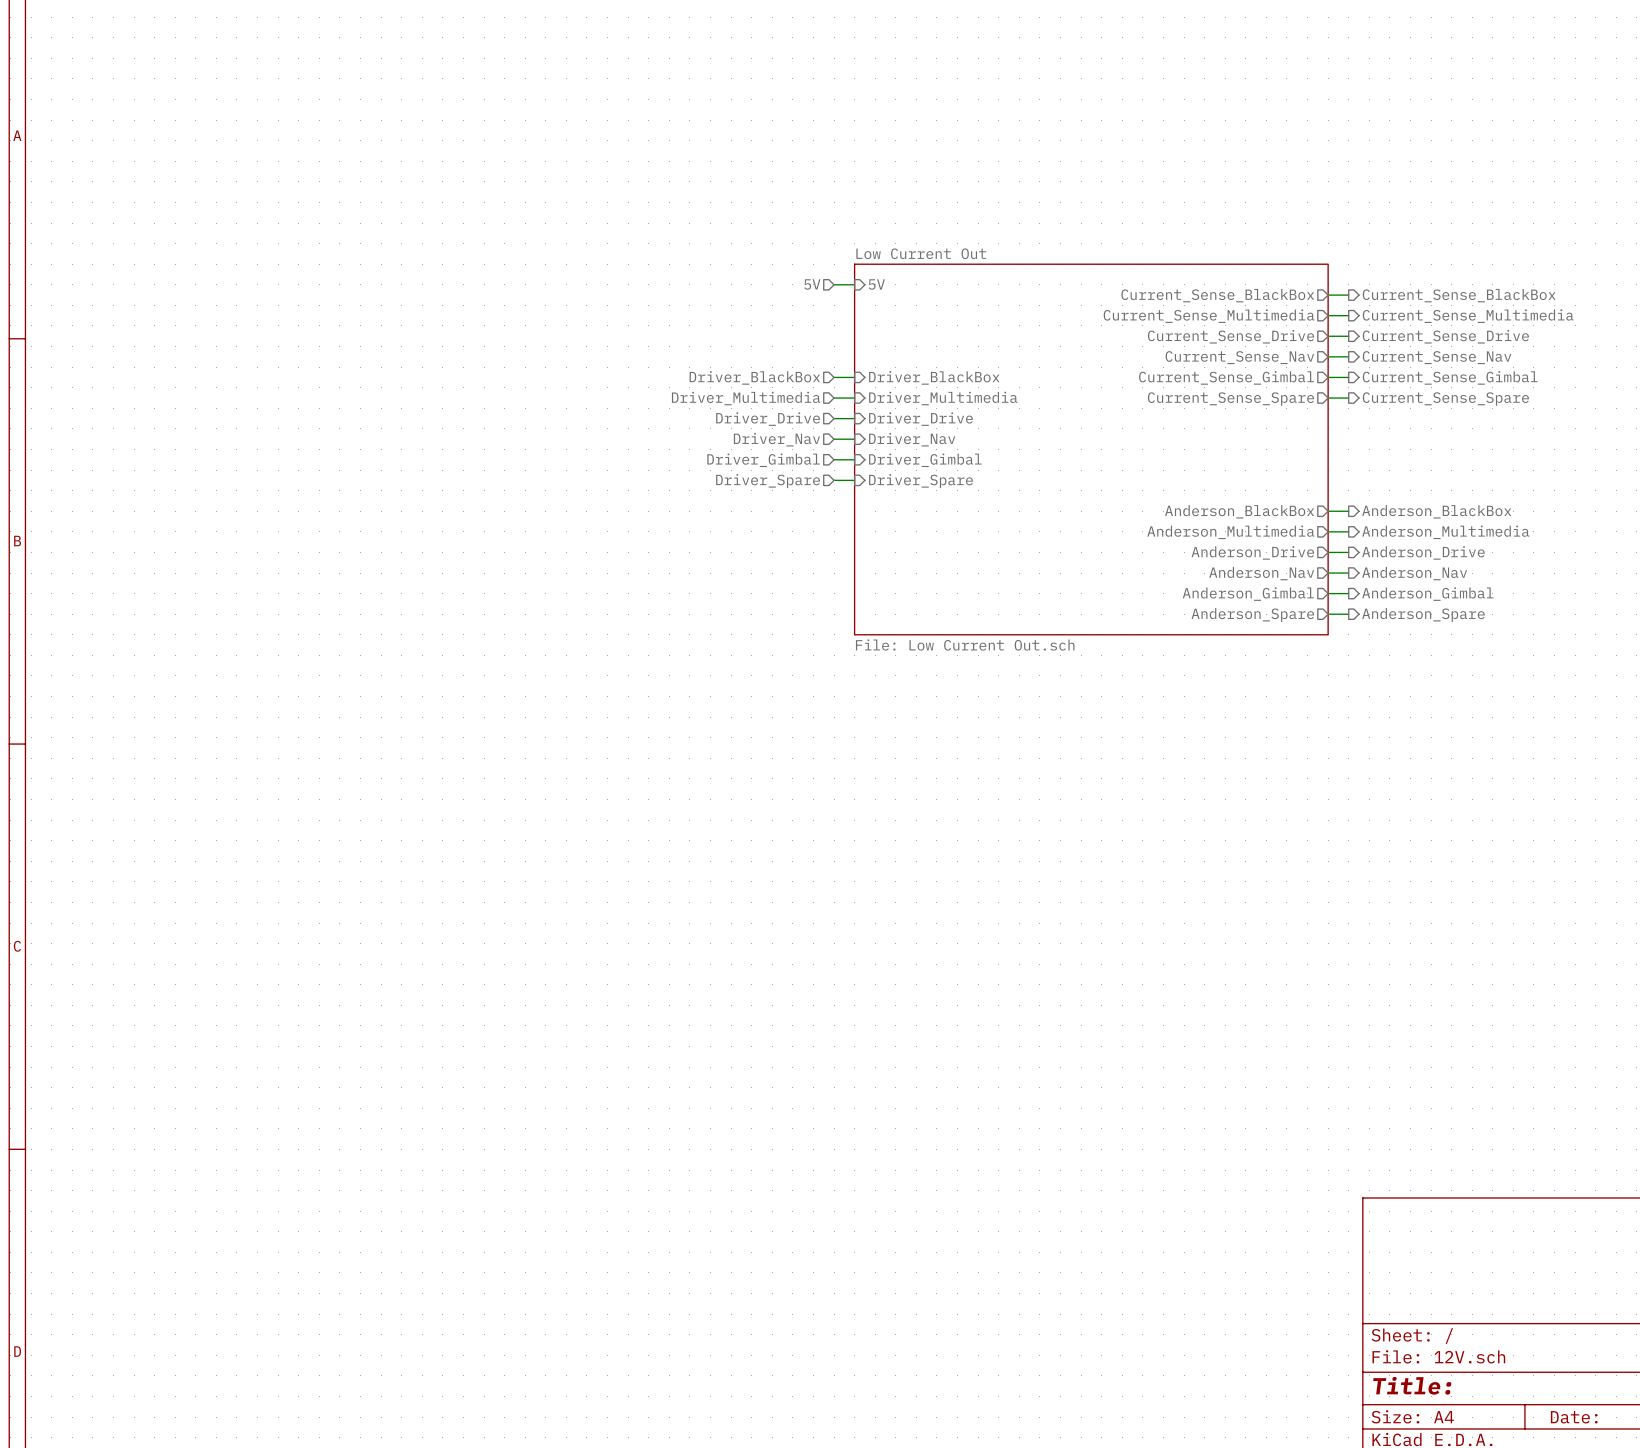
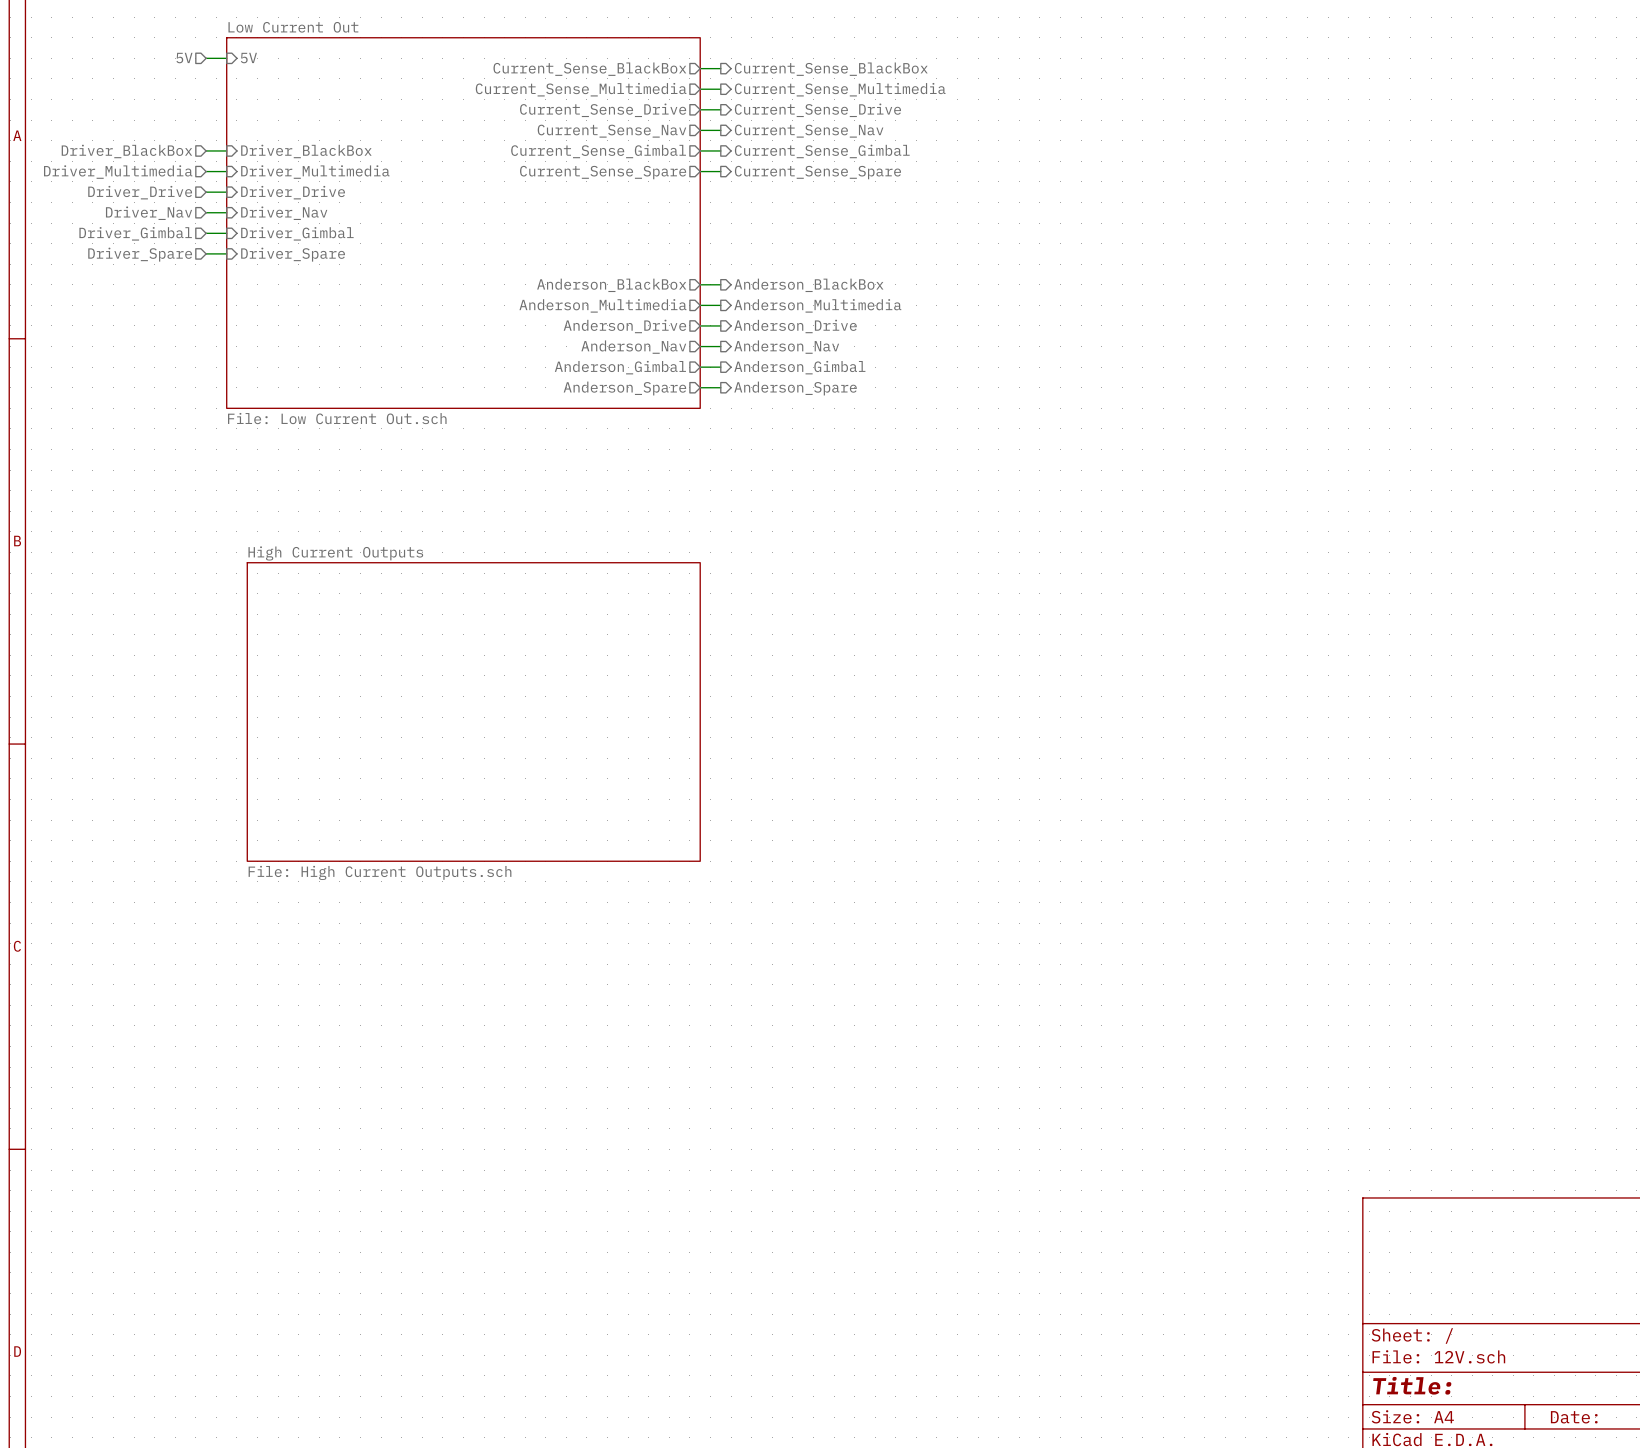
hierarchical label: none -> 5V (184, 58)
wire: none -> (206, 58) (226, 58)
sheet pin: none -> 5V (248, 58)
wire: none -> (700, 68) (720, 68)
sheet pin: none -> Current_Sense_BlackBox (589, 69)
hierarchical label: none -> Current_Sense_BlackBox (831, 69)
sheet pin: none -> Current_Sense_Multimedia (581, 89)
wire: none -> (700, 89) (720, 89)
hierarchical label: none -> Current_Sense_Multimedia (840, 89)
wire: none -> (700, 109) (720, 109)
sheet pin: none -> Current_Sense_Drive (603, 110)
hierarchical label: none -> Current_Sense_Drive (817, 110)
wire: none -> (700, 130) (720, 130)
sheet pin: none -> Current_Sense_Nav (611, 131)
hierarchical label: none -> Current_Sense_Nav (809, 131)
wire: none -> (206, 150) (226, 150)
wire: none -> (700, 150) (720, 150)
hierarchical label: none -> Driver_BlackBox (126, 151)
sheet pin: none -> Driver_BlackBox (306, 151)
sheet pin: none -> Current_Sense_Gimbal (598, 151)
hierarchical label: none -> Current_Sense_Gimbal (822, 151)
wire: none -> (206, 171) (226, 171)
hierarchical label: none -> Driver_Multimedia (118, 172)
sheet pin: none -> Driver_Multimedia (315, 172)
sheet pin: none -> Current_Sense_Spare (603, 172)
hierarchical label: none -> Current_Sense_Spare (817, 172)
hierarchical label: none -> Driver_Drive (140, 192)
wire: none -> (206, 192) (226, 192)
sheet pin: none -> Driver_Drive (293, 192)
wire: none -> (206, 212) (226, 212)
hierarchical label: none -> Driver_Nav (149, 213)
sheet pin: none -> Driver_Nav (284, 213)
sheet Low Current Out: none -> File: Low Current Out.sch (463, 223)
hierarchical label: none -> Driver_Gimbal (135, 233)
wire: none -> (206, 233) (226, 233)
sheet pin: none -> Driver_Gimbal (297, 233)
wire: none -> (206, 253) (226, 253)
hierarchical label: none -> Driver_Spare (140, 254)
sheet pin: none -> Driver_Spare (293, 254)
hierarchical label: 5V (812, 284) -> none
wire: (834, 284) (854, 284) -> (700, 171) (720, 171)
sheet pin: 5V (876, 284) -> none
sheet pin: none -> Anderson_BlackBox (611, 285)
hierarchical label: none -> Anderson_BlackBox (808, 285)
sheet pin: Current_Sense_BlackBox (1217, 295) -> none
wire: (1328, 295) (1348, 295) -> none
hierarchical label: Current_Sense_BlackBox (1459, 295) -> none
sheet pin: none -> Anderson_Multimedia (602, 305)
hierarchical label: none -> Anderson_Multimedia (817, 305)
wire: (1328, 315) (1348, 315) -> none
sheet pin: Current_Sense_Multimedia (1209, 316) -> none
hierarchical label: Current_Sense_Multimedia (1468, 316) -> none
sheet pin: none -> Anderson_Drive (624, 326)
hierarchical label: none -> Anderson_Drive (795, 326)
sheet pin: Current_Sense_Drive (1231, 336) -> none
wire: (1328, 336) (1348, 336) -> none
hierarchical label: Current_Sense_Drive (1445, 336) -> none
sheet pin: none -> Anderson_Nav (633, 347)
hierarchical label: none -> Anderson_Nav (786, 347)
wire: (1328, 356) (1348, 356) -> none
sheet pin: Current_Sense_Nav (1239, 357) -> none
hierarchical label: Current_Sense_Nav (1437, 357) -> none
sheet pin: none -> Anderson_Gimbal (620, 367)
hierarchical label: none -> Anderson_Gimbal (799, 367)
hierarchical label: Driver_BlackBox (754, 377) -> none
wire: (834, 377) (854, 377) -> (700, 284) (720, 284)
sheet pin: Driver_BlackBox (934, 377) -> none
sheet pin: Current_Sense_Gimbal (1226, 377) -> none
wire: (1328, 377) (1348, 377) -> none
hierarchical label: Current_Sense_Gimbal (1450, 377) -> none
sheet pin: none -> Anderson_Spare (624, 388)
hierarchical label: none -> Anderson_Spare (795, 388)
hierarchical label: Driver_Multimedia (746, 398) -> none
wire: (834, 398) (854, 398) -> (700, 305) (720, 305)
sheet pin: Driver_Multimedia (943, 398) -> none
wire: (1328, 398) (1348, 398) -> none
sheet pin: Current_Sense_Spare (1231, 399) -> none
hierarchical label: Current_Sense_Spare (1445, 399) -> none
wire: (834, 418) (854, 418) -> (700, 325) (720, 325)
hierarchical label: Driver_Drive (768, 419) -> none
sheet pin: Driver_Drive (920, 419) -> none
hierarchical label: Driver_Nav (776, 439) -> none
wire: (834, 439) (854, 439) -> (700, 346) (720, 346)
sheet pin: Driver_Nav (912, 439) -> none
sheet Low Current Out: File: Low Current Out.sch (1091, 449) -> none
wire: (834, 459) (854, 459) -> (700, 367) (720, 367)
hierarchical label: Driver_Gimbal (763, 460) -> none
sheet pin: Driver_Gimbal (925, 460) -> none
wire: (834, 480) (854, 480) -> (700, 387) (720, 387)
hierarchical label: Driver_Spare (768, 481) -> none
sheet pin: Driver_Spare (920, 481) -> none
sheet pin: Anderson_BlackBox (1239, 511) -> none
wire: (1328, 511) (1348, 511) -> none
hierarchical label: Anderson_BlackBox (1436, 511) -> none
wire: (1328, 531) (1348, 531) -> none
sheet pin: Anderson_Multimedia (1230, 532) -> none
hierarchical label: Anderson_Multimedia (1445, 532) -> none
sheet pin: Anderson_Drive (1252, 552) -> none
wire: (1328, 552) (1348, 552) -> none
hierarchical label: Anderson_Drive (1423, 552) -> none
sheet pin: Anderson_Nav (1261, 573) -> none
wire: (1328, 573) (1348, 573) -> none
hierarchical label: Anderson_Nav (1414, 573) -> none
wire: (1328, 593) (1348, 593) -> none
sheet pin: Anderson_Gimbal (1248, 594) -> none
hierarchical label: Anderson_Gimbal (1427, 594) -> none
sheet pin: Anderson_Spare (1252, 614) -> none
wire: (1328, 614) (1348, 614) -> none
hierarchical label: Anderson_Spare (1423, 614) -> none
sheet High Current Outputs: none -> File: High Current Outputs.sch (473, 711)

